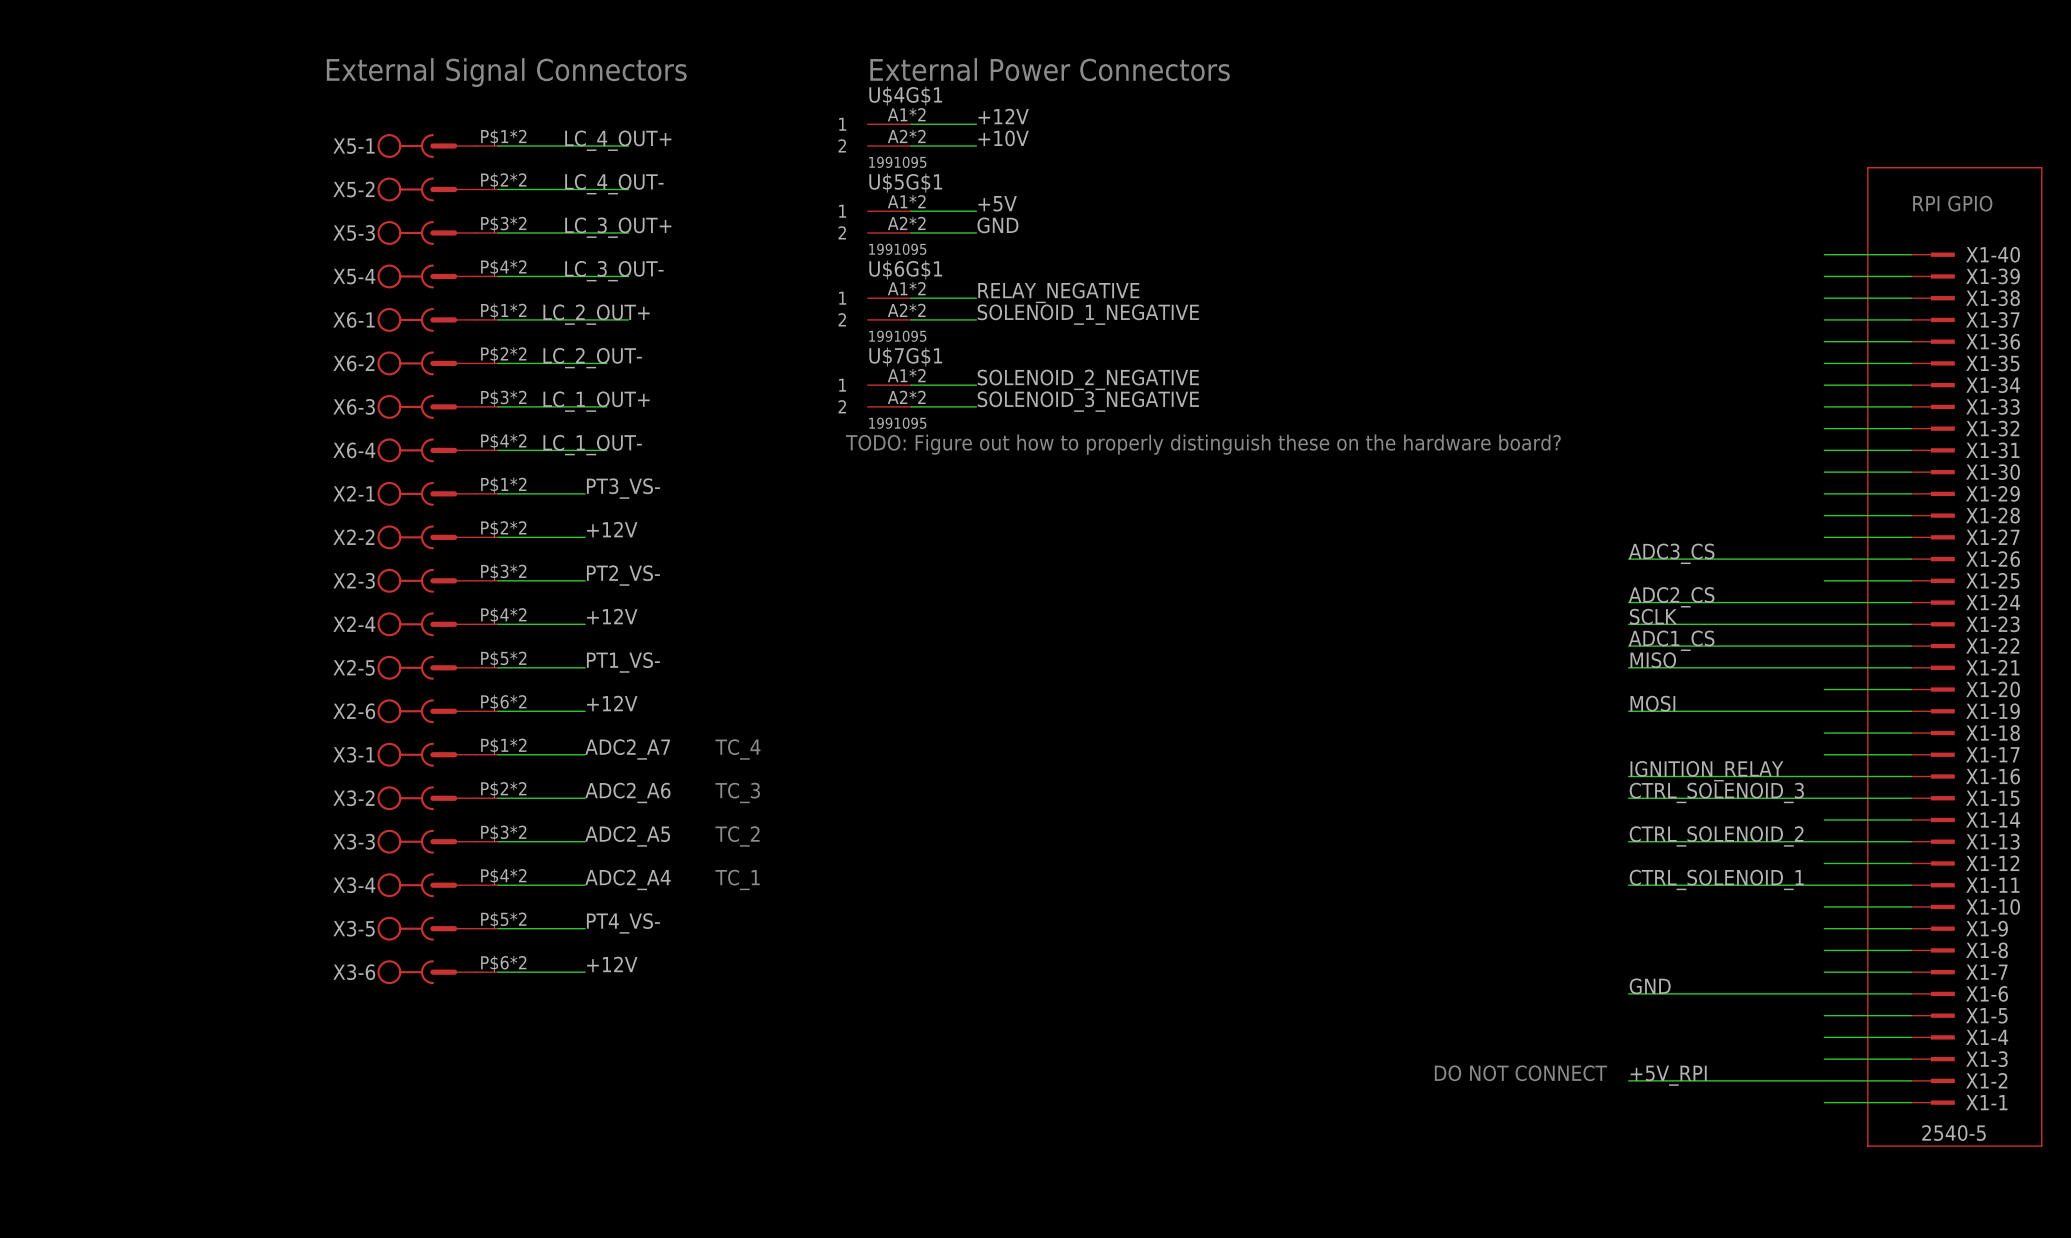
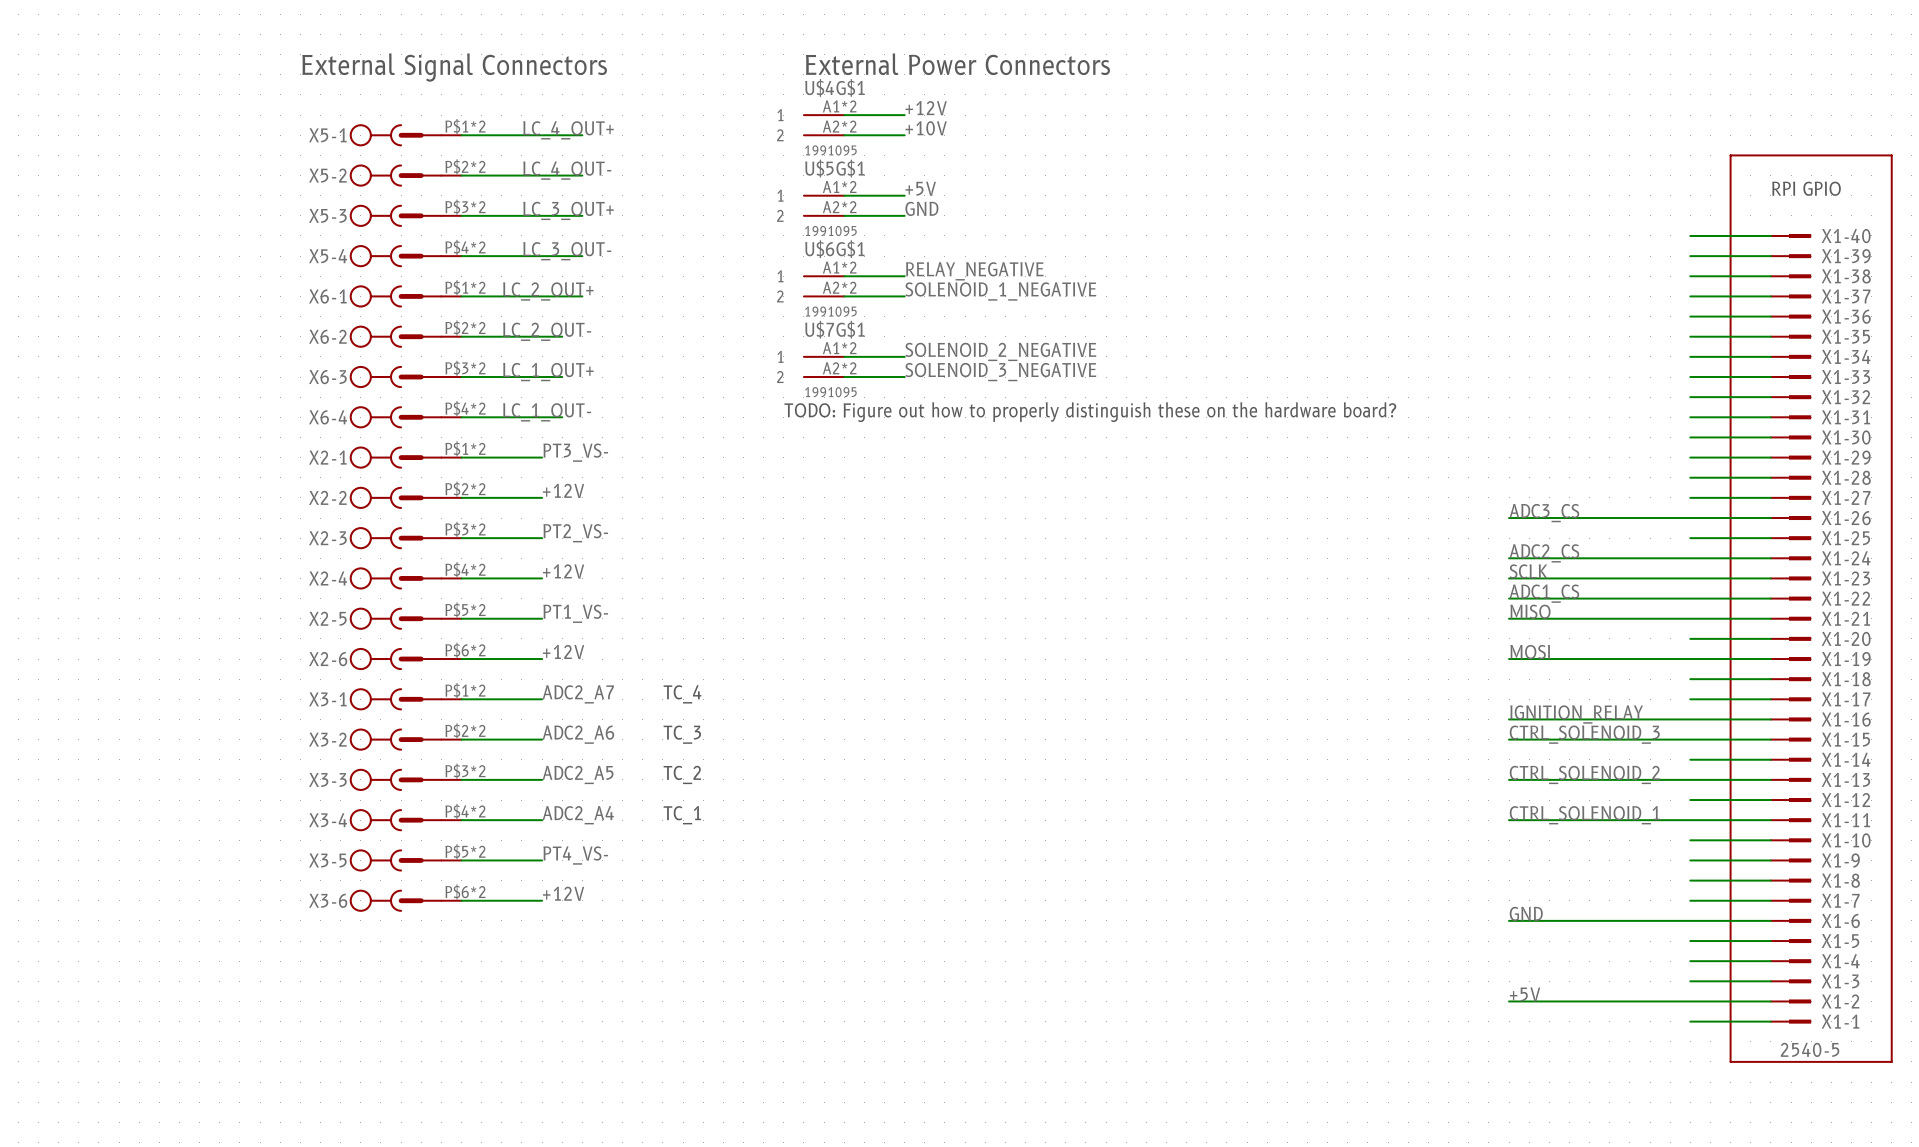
text: DO NOT CONNECT (1520, 1073) -> none
label: +5V_RPI (1668, 1075) -> +5V (1525, 994)

